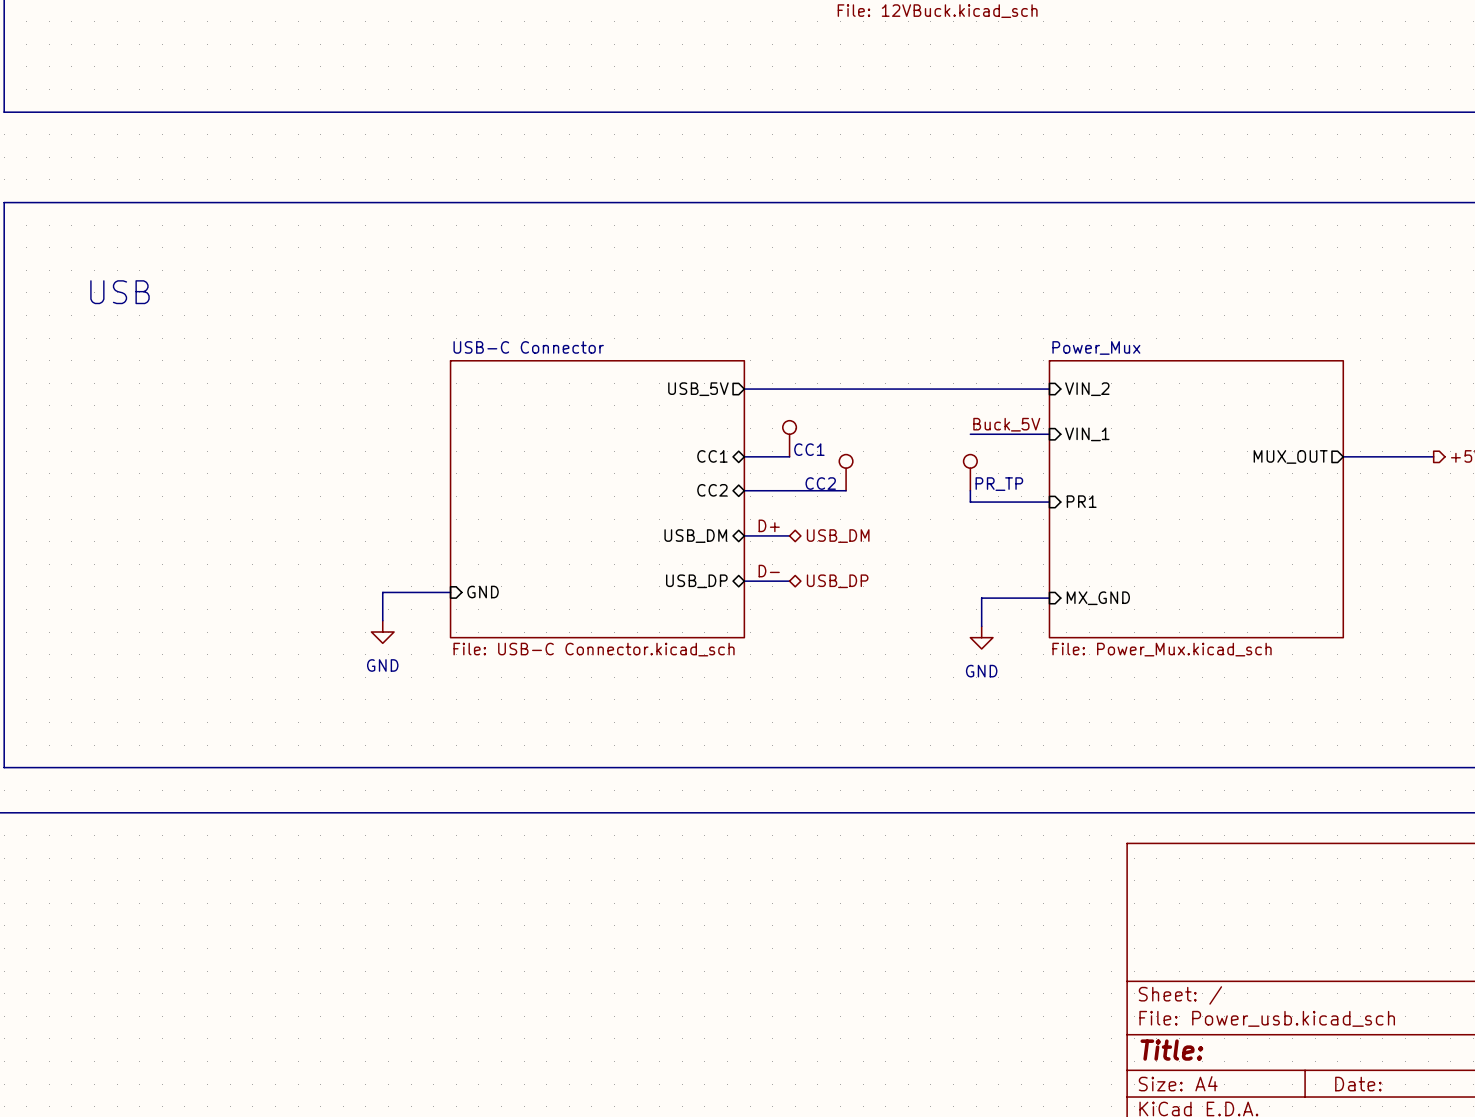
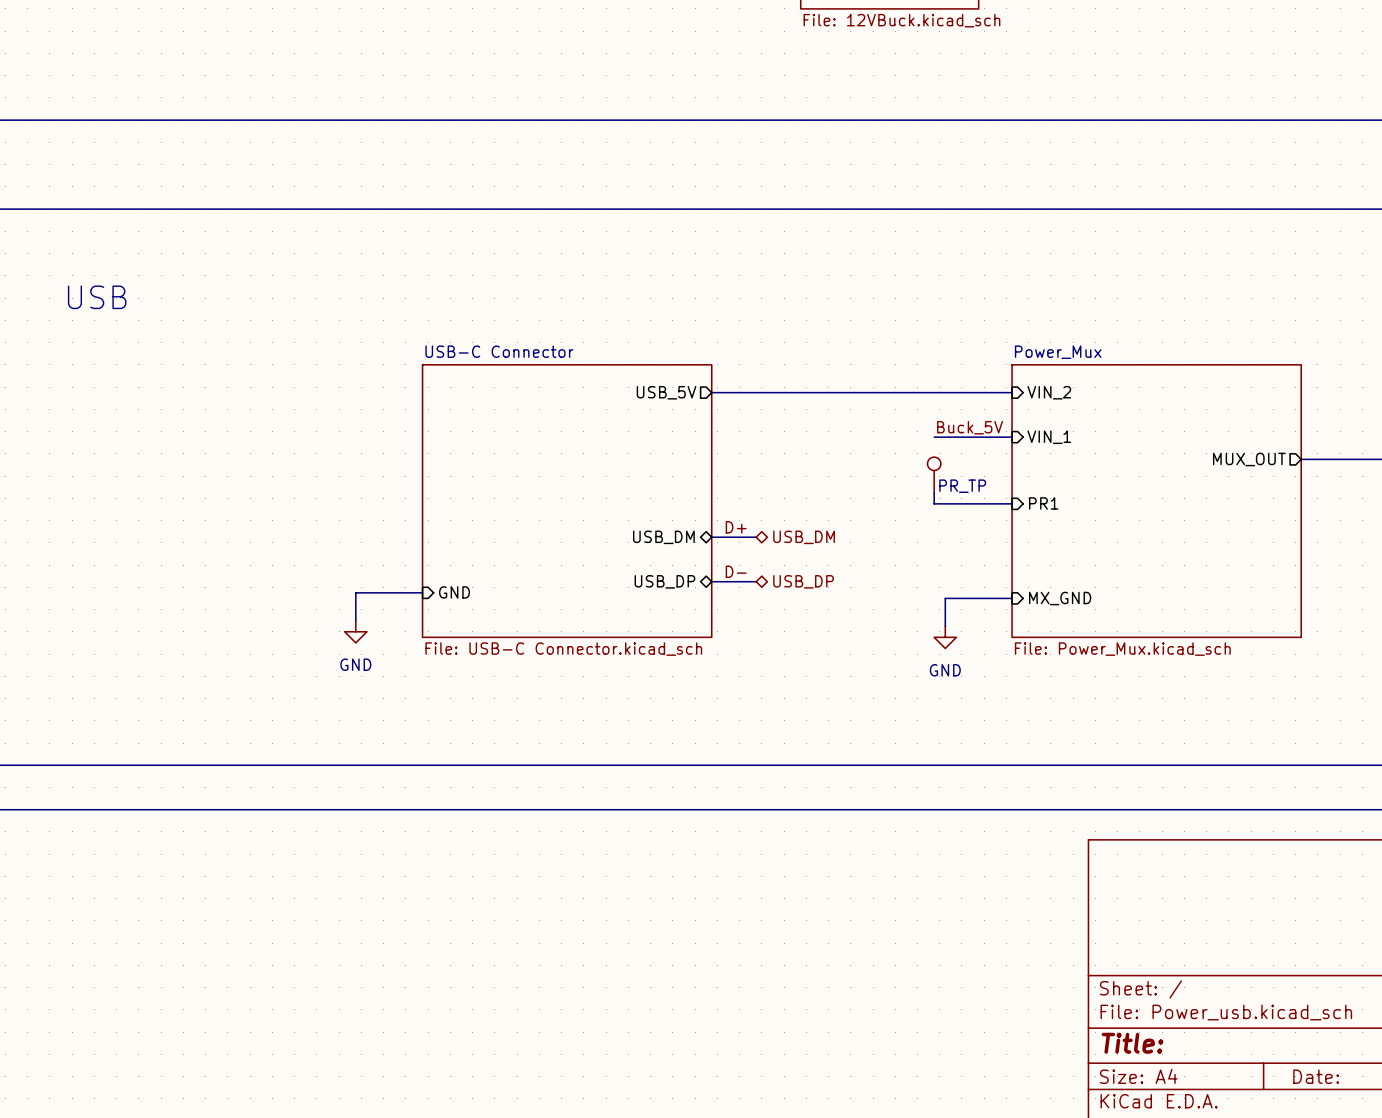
part: CC1 (789, 438) -> none
sheet pin: CC1 (712, 456) -> none
wire: (744, 456) (789, 456) -> none
part: CC2 (846, 472) -> none
sheet pin: CC2 (712, 490) -> none
wire: (744, 490) (846, 490) -> none

